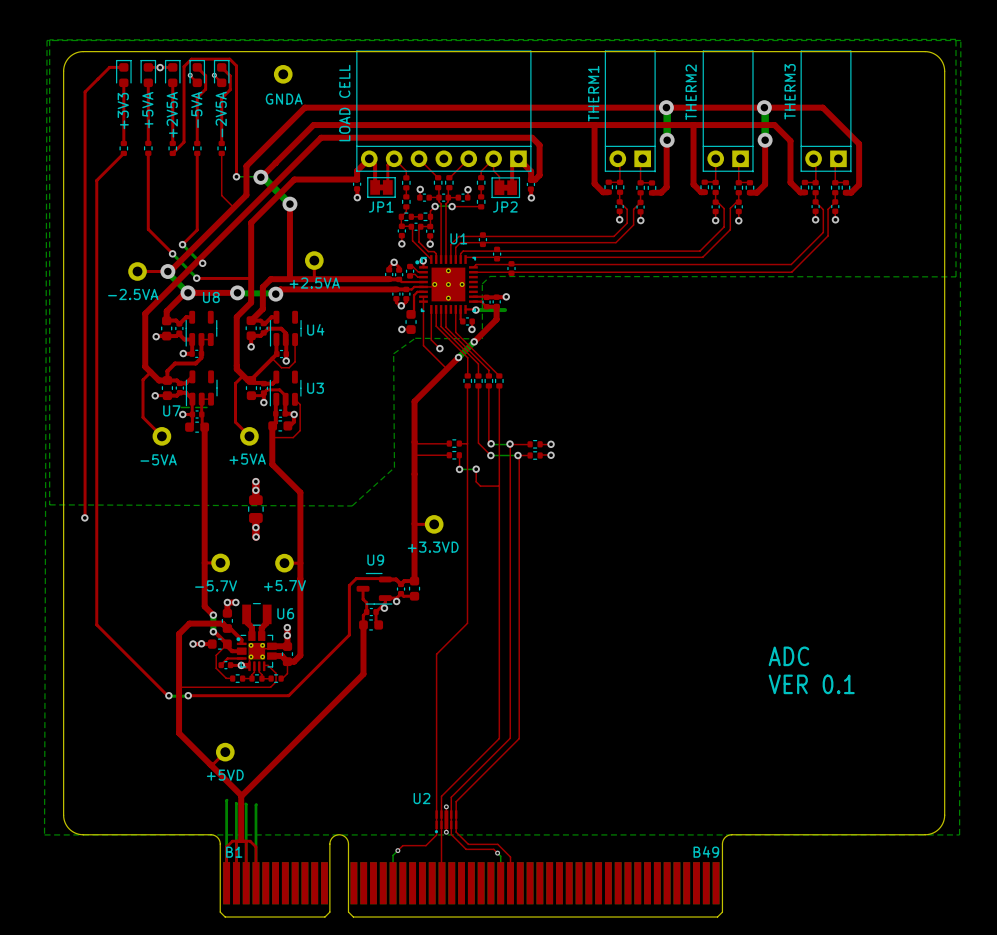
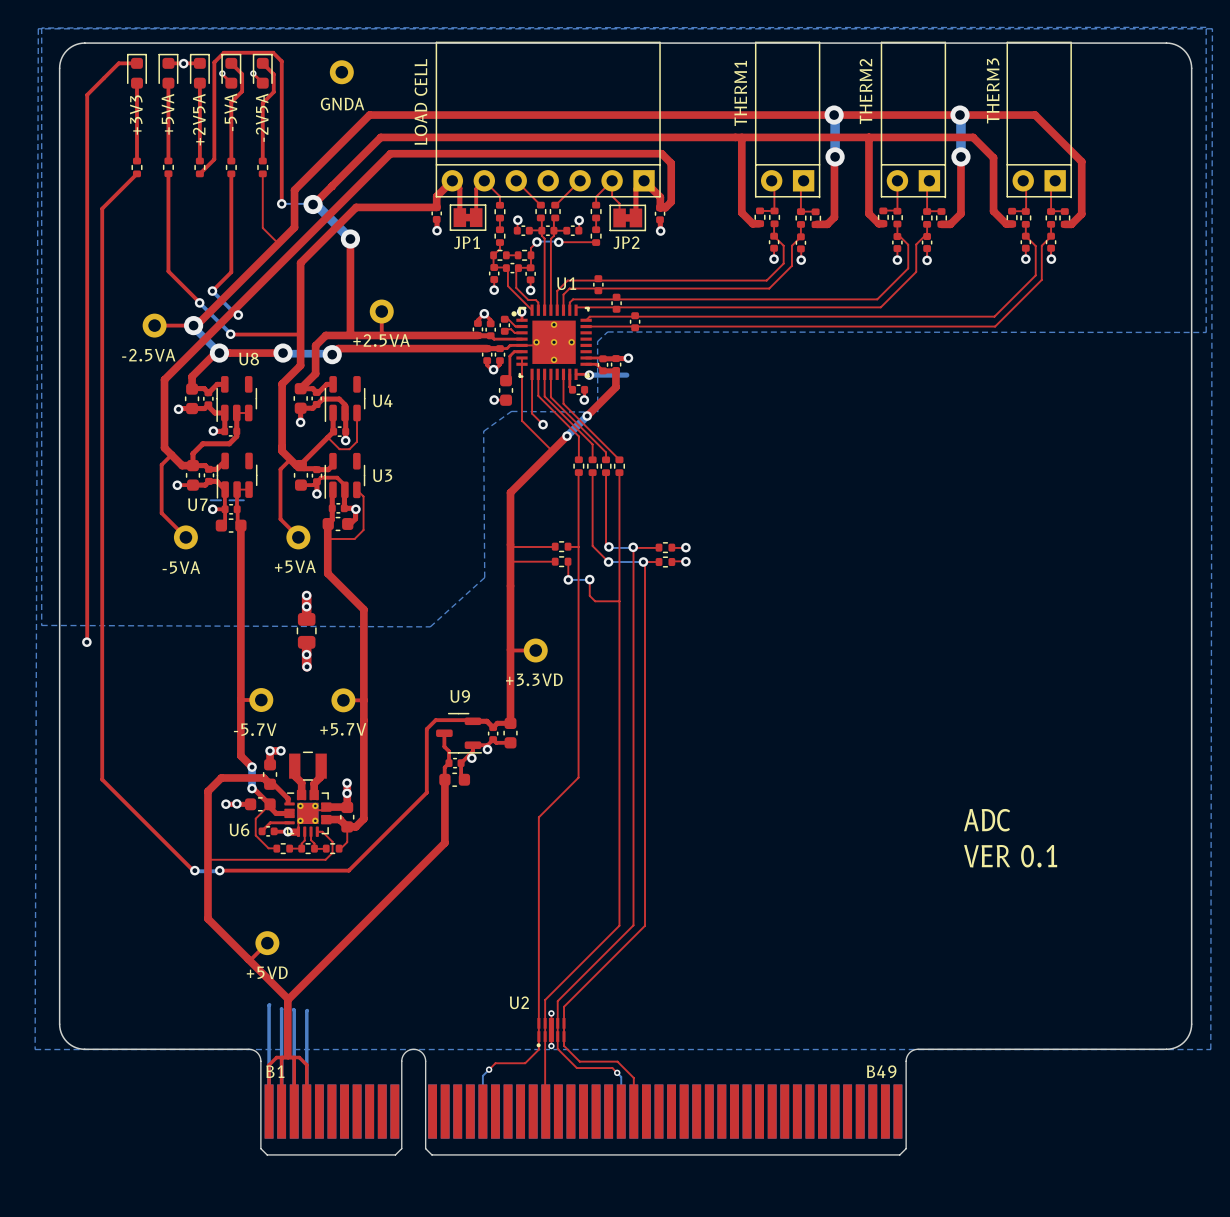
U6 name position: U6 (285, 613) -> U6 (239, 829)
U6 footprint: [236, 631, 277, 672] -> [284, 789, 332, 837]

